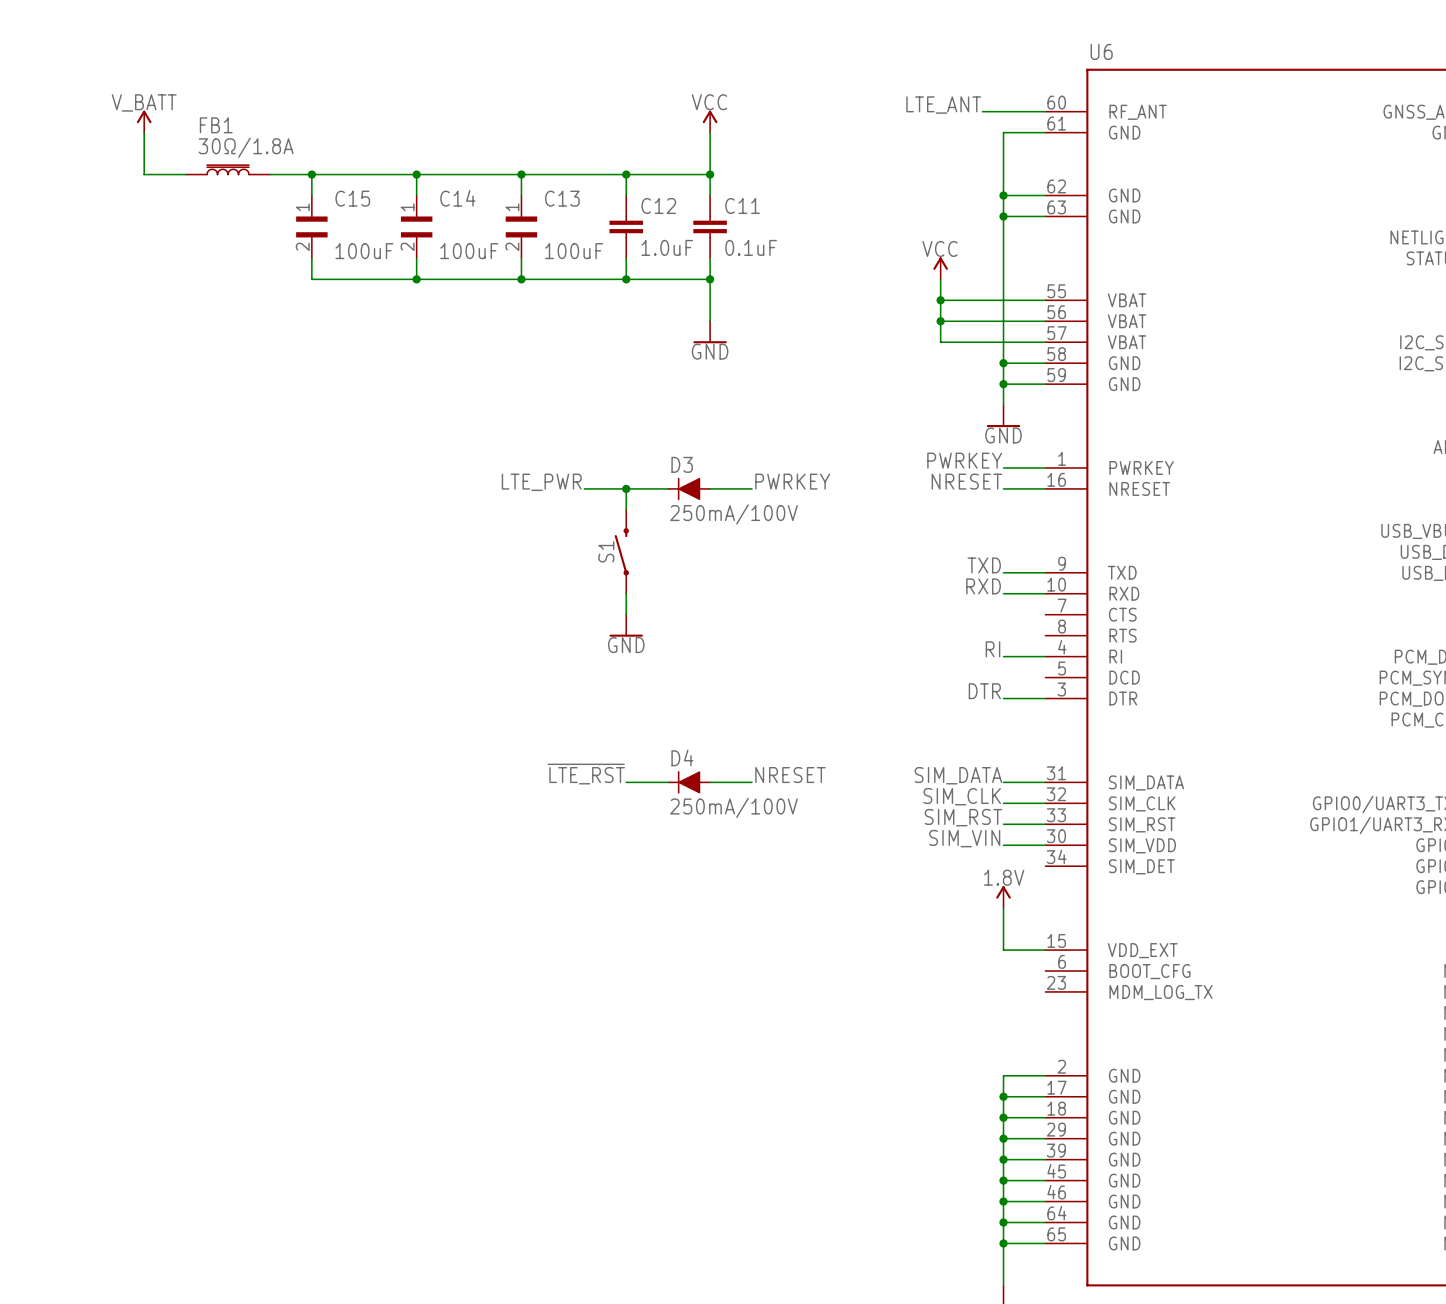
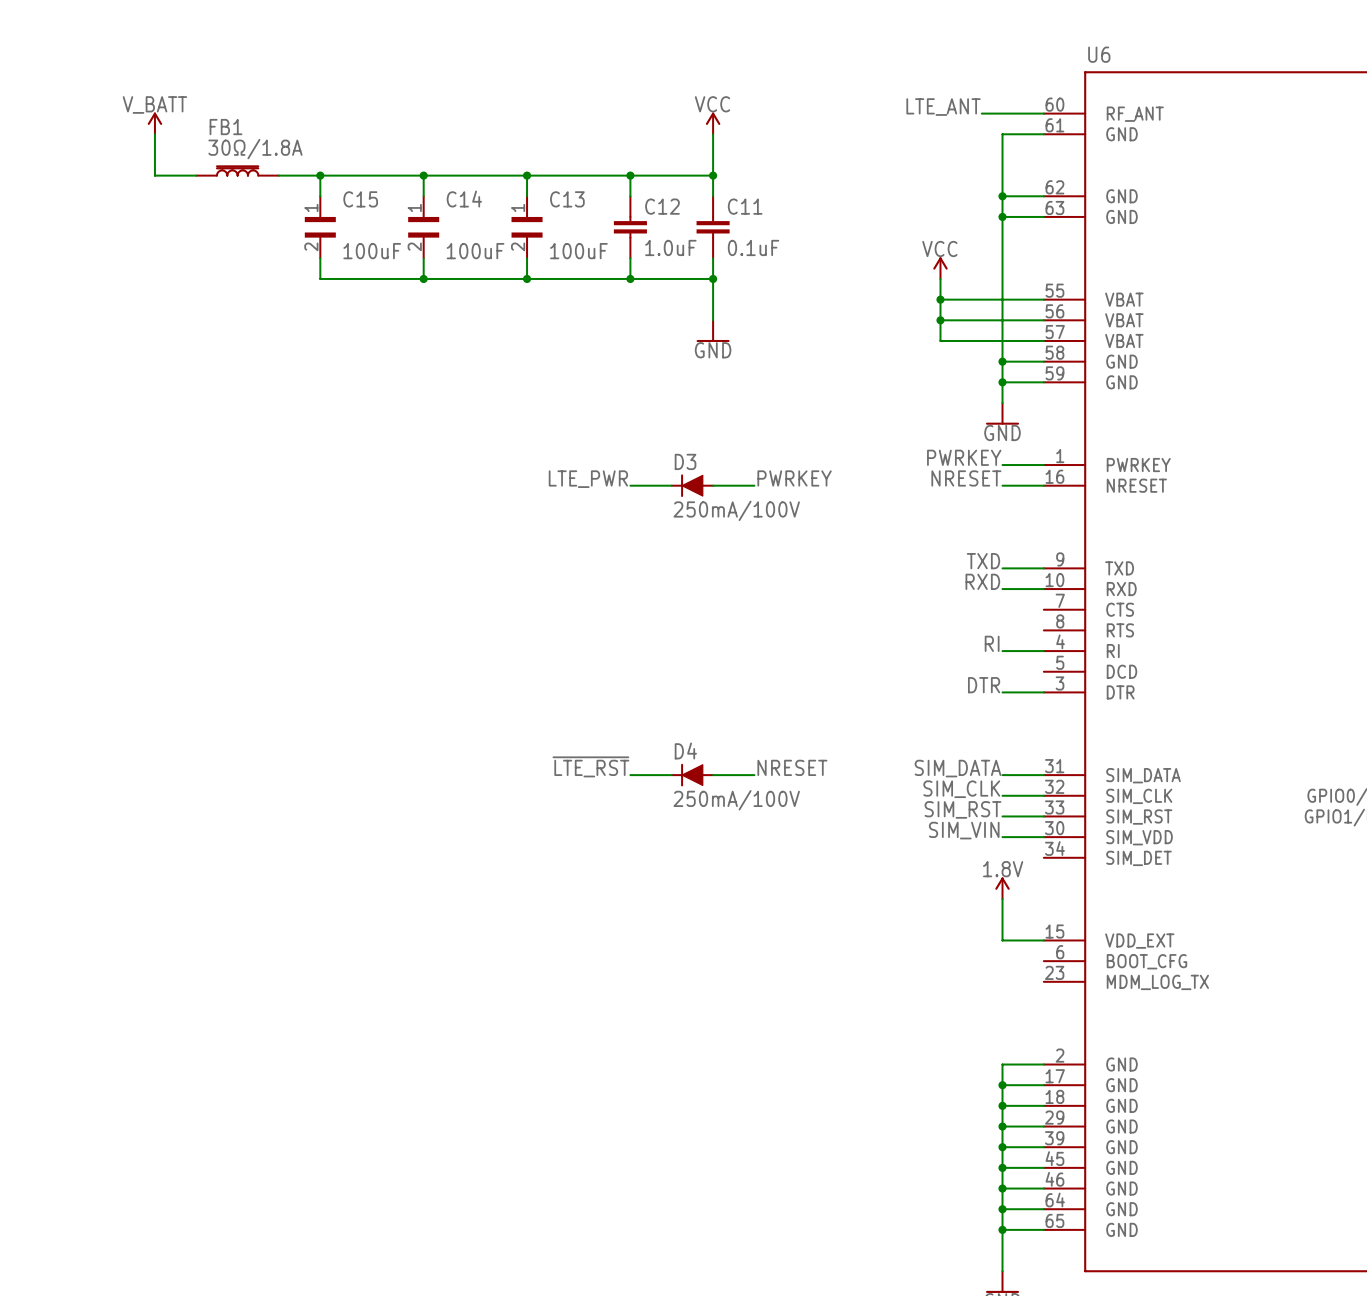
label position: LTE_PWR (541, 482) -> LTE_PWR (588, 479)
wire: (584, 488) (626, 488) (626, 509) -> none
junction: (626, 488) -> none
S1: (621, 551) -> none
wire: (626, 593) (626, 614) -> none
power symbol: GND (626, 625) -> none

